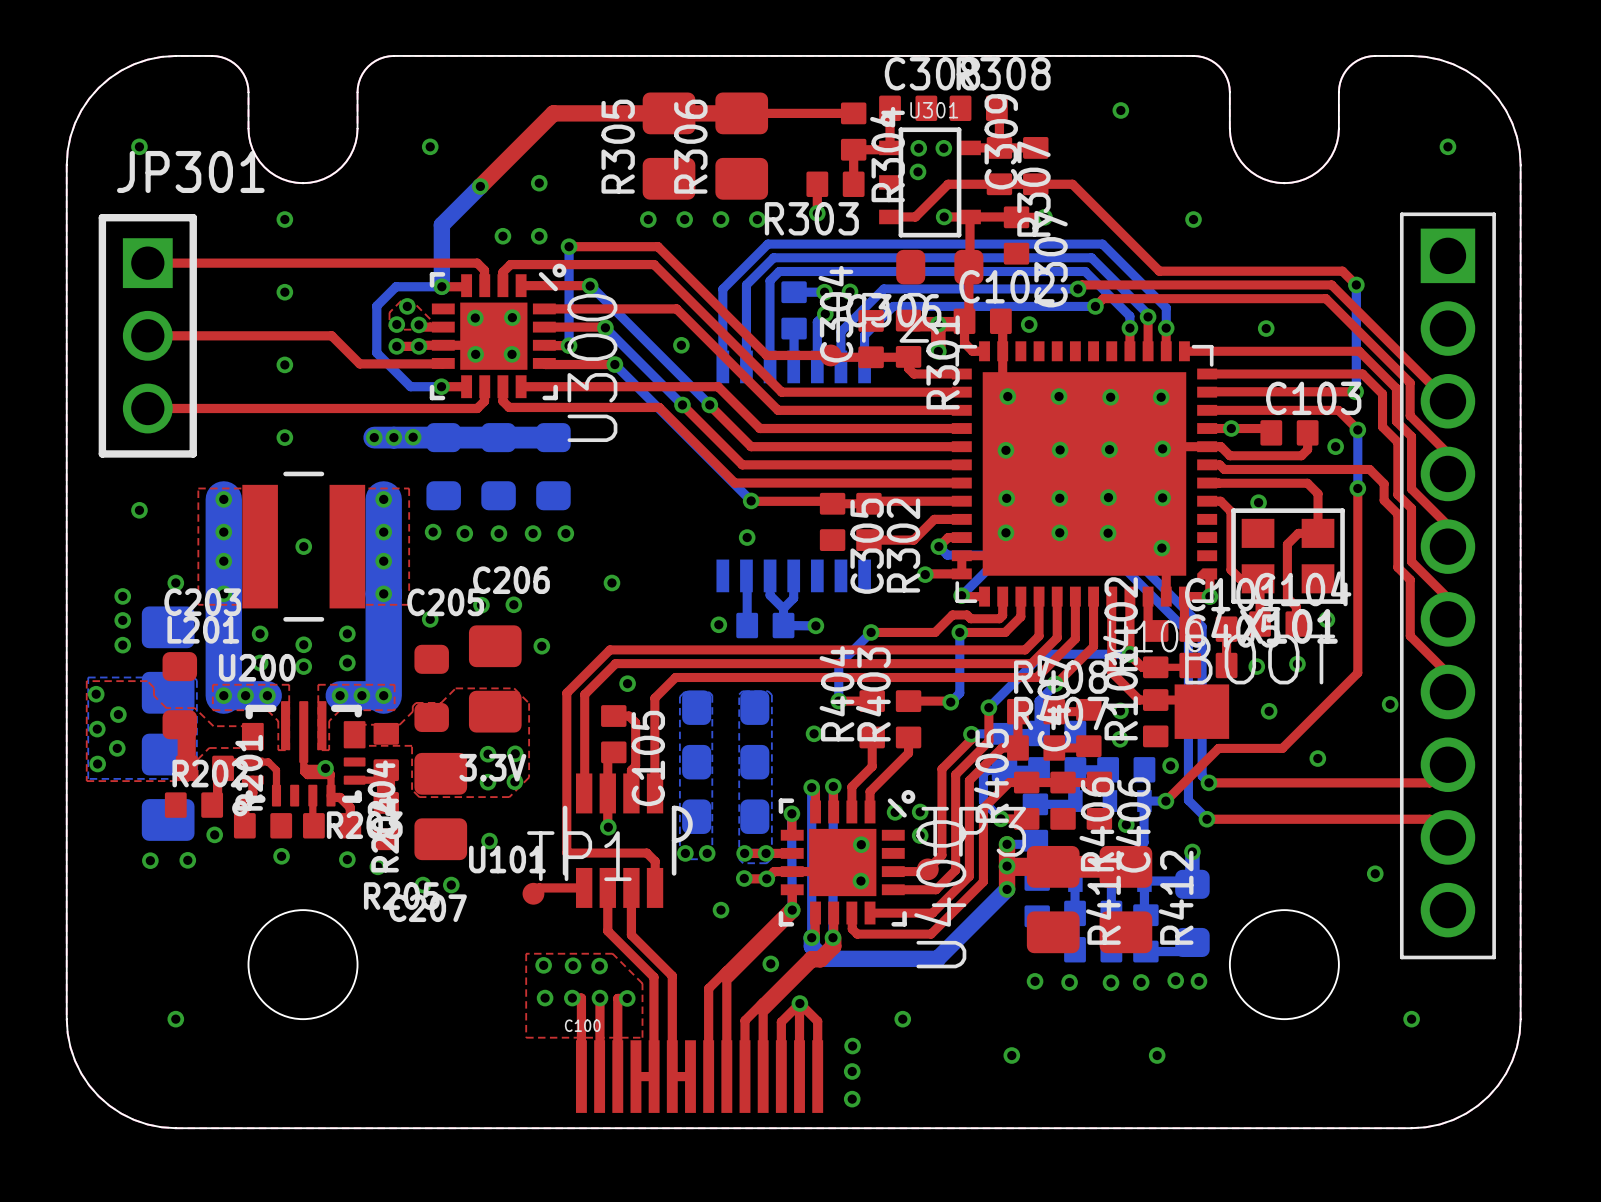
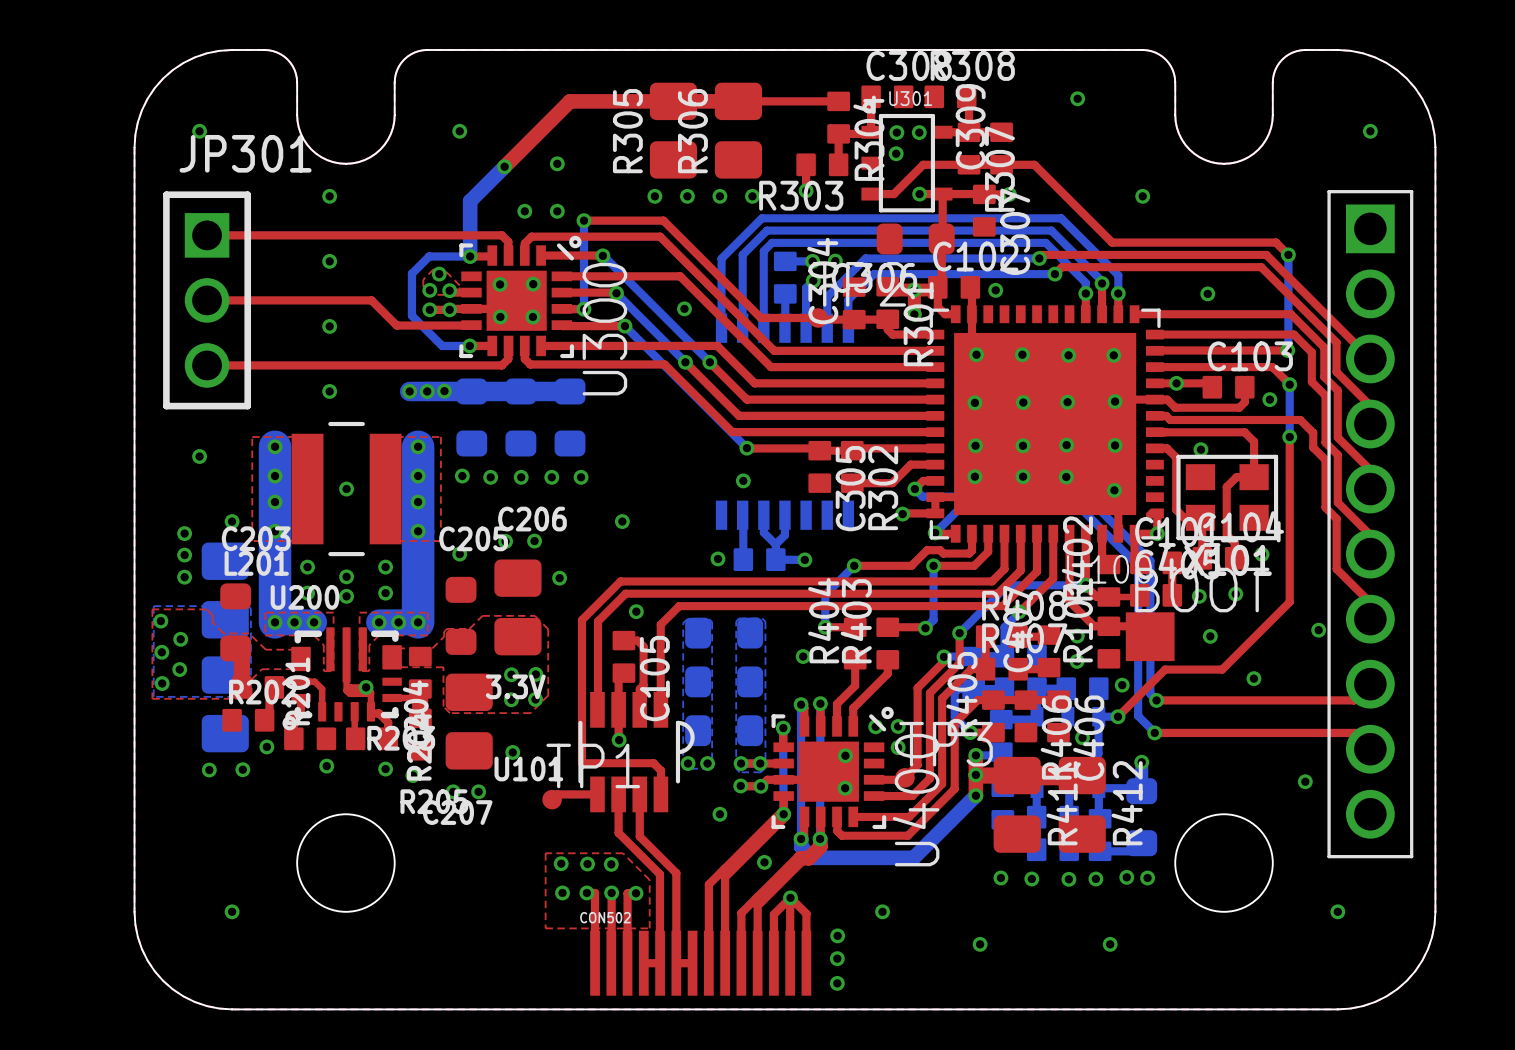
C100 name: C100 (582, 1025) -> CON502 (605, 917)

